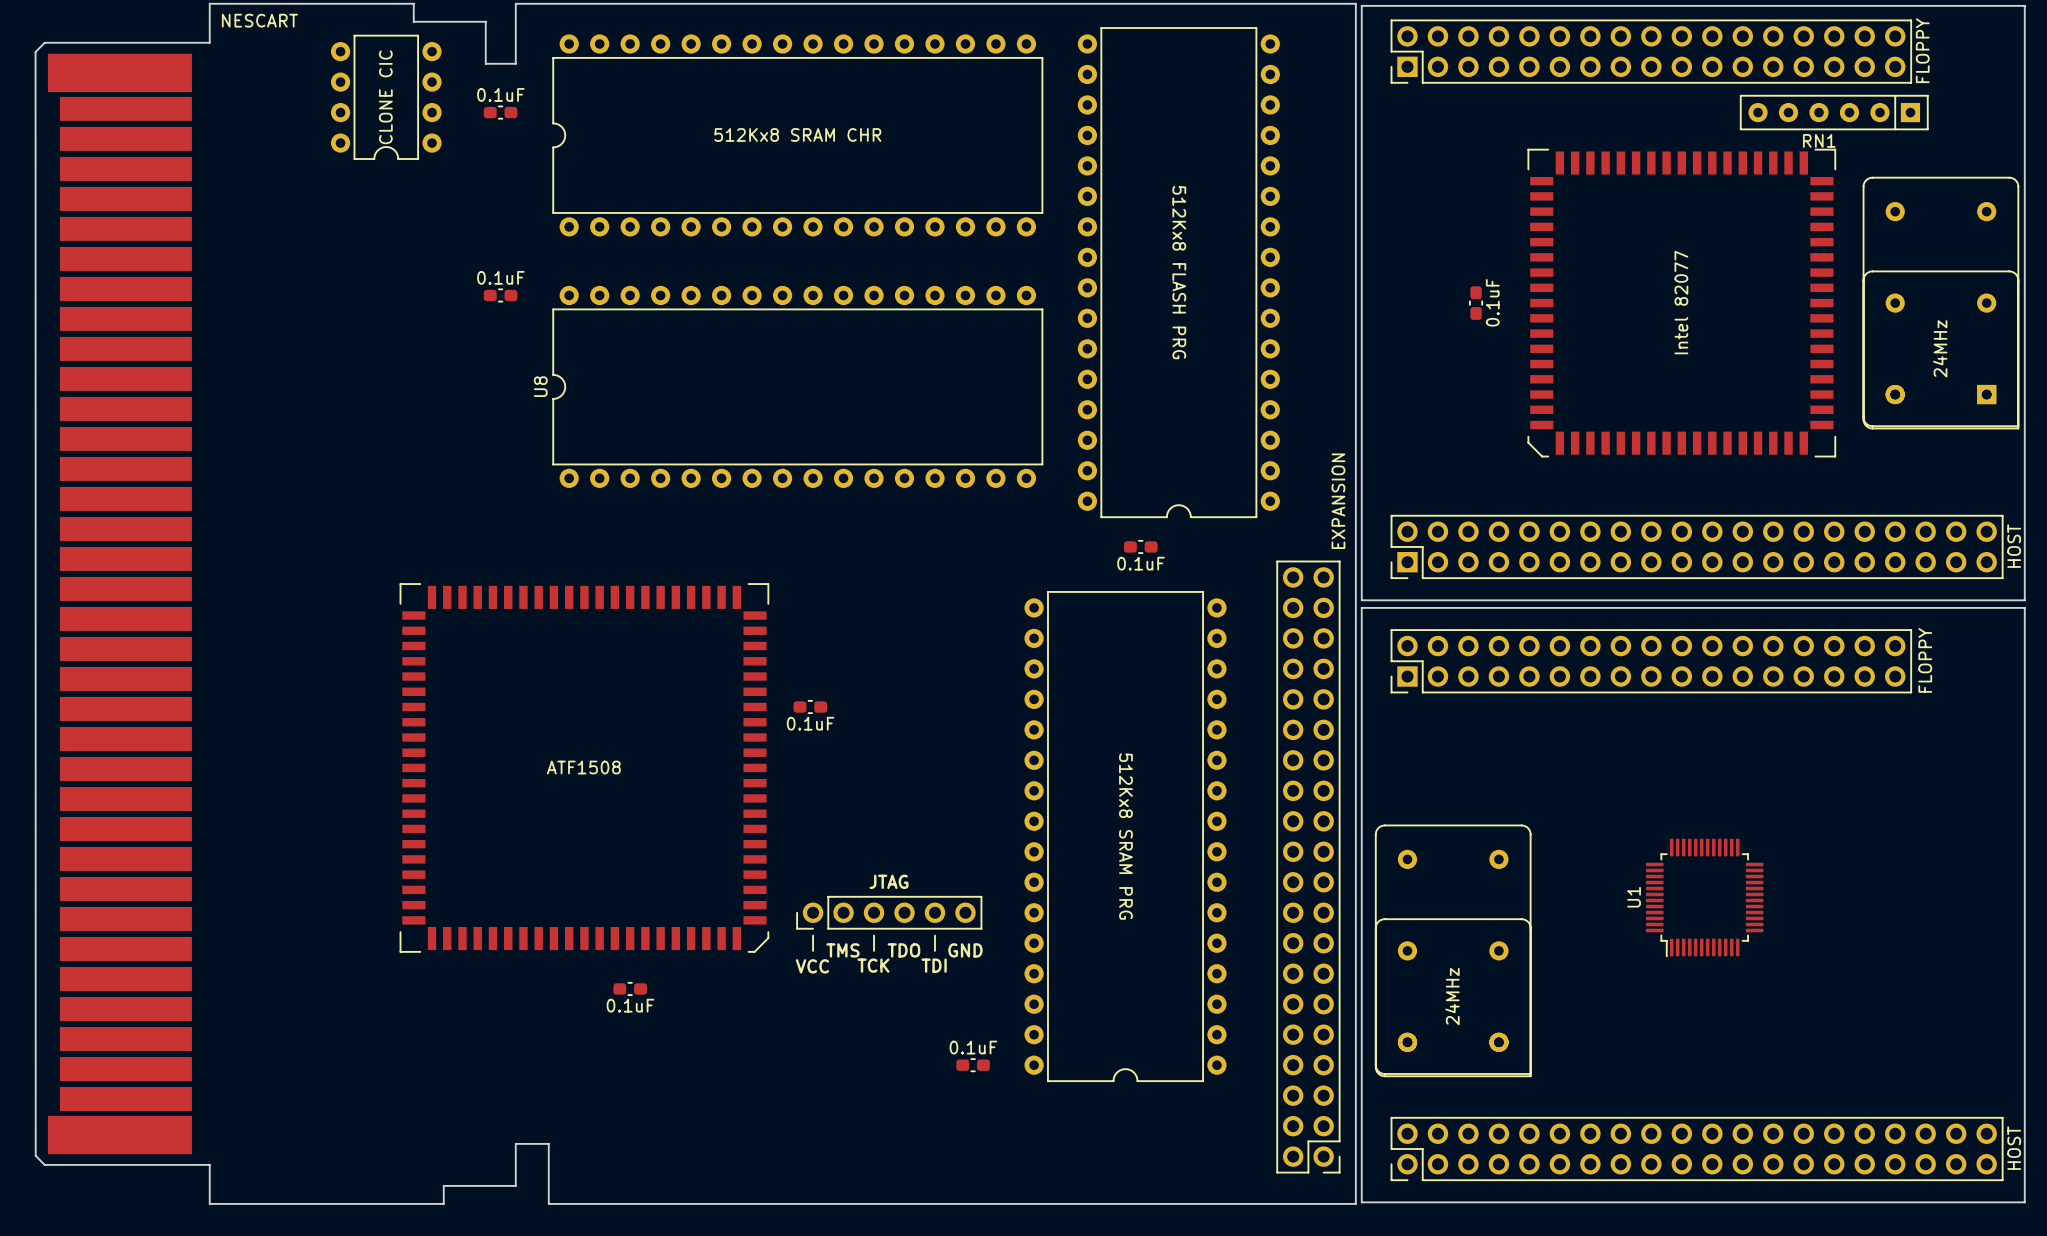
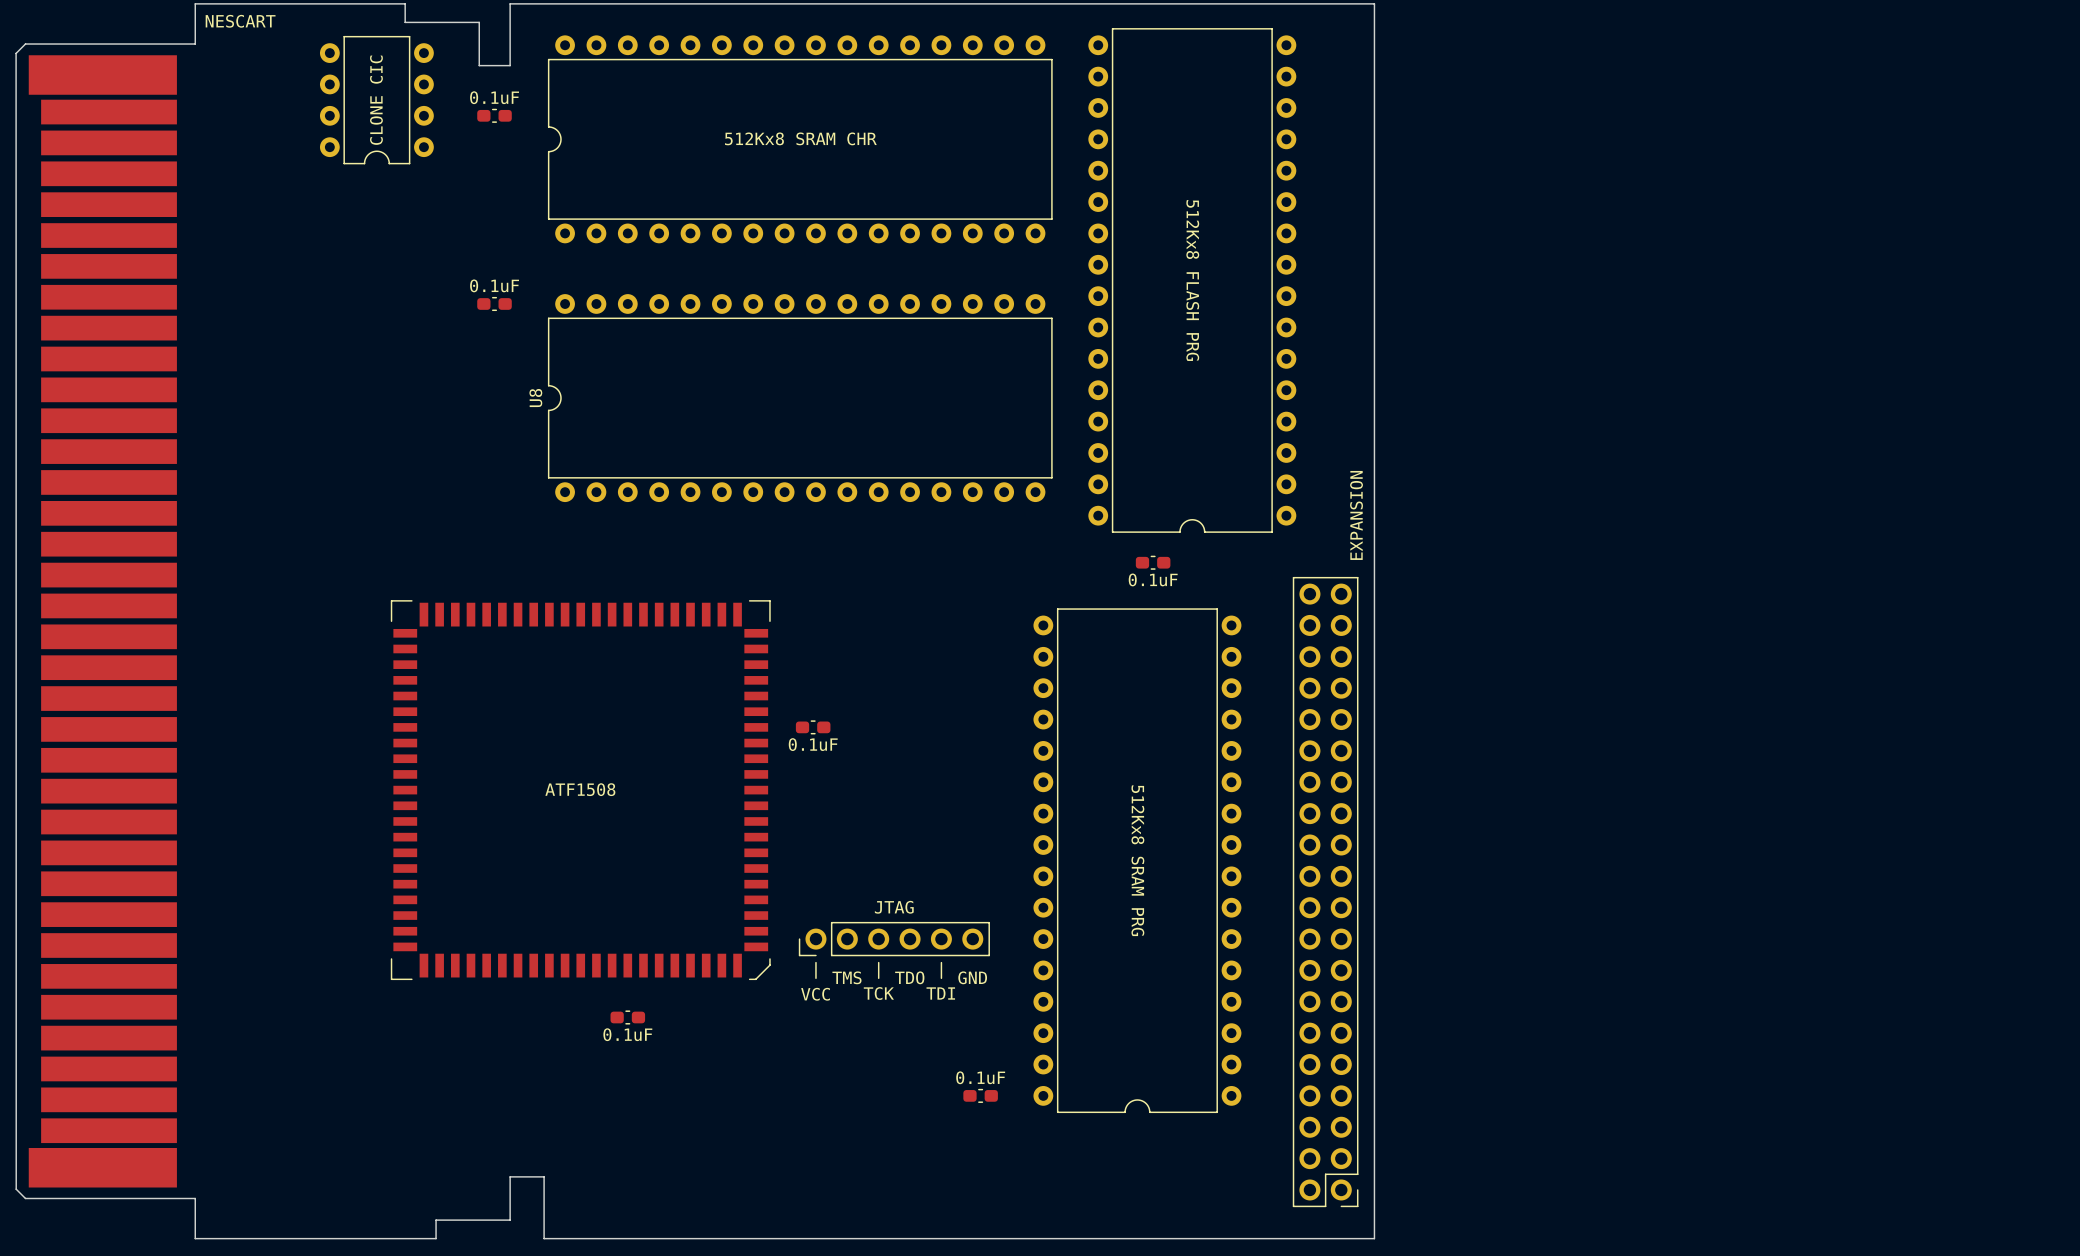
board edge: (1361, 5) (2024, 5) (2024, 600) (1361, 600) (1361, 5) -> none
part: FLOPPY (1651, 51) -> none
RN1: (1834, 112) -> none
part: 0.1uF (1476, 303) -> none
part: Intel 82077 (1681, 303) -> none
part: (1940, 303) -> none
part: 24MHz (1940, 348) -> none
part: HOST (1697, 546) -> none
board edge: (1361, 607) (1361, 1202) (2024, 1202) (2024, 607) (1361, 607) -> none
part: FLOPPY (1651, 661) -> none
U1: (1704, 897) -> none
part: (1453, 950) -> none
part: 24MHz (1453, 996) -> none
part: HOST (1697, 1149) -> none

